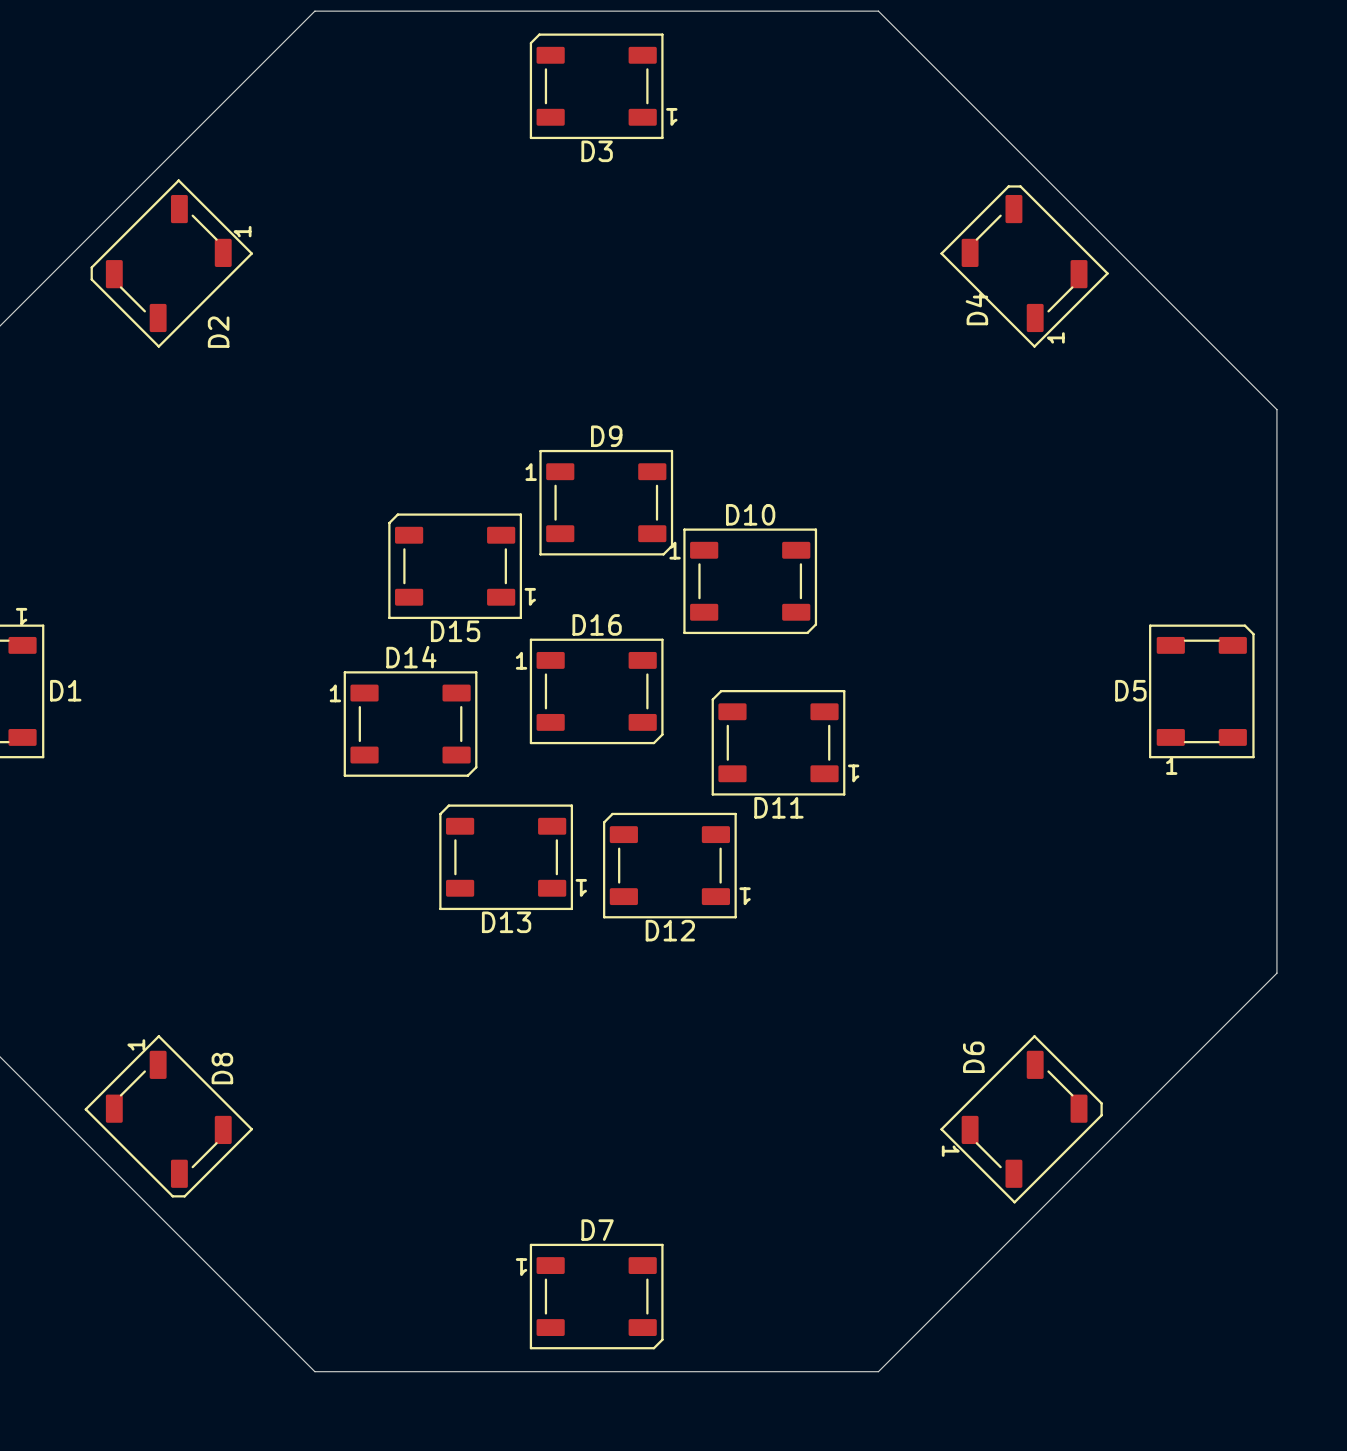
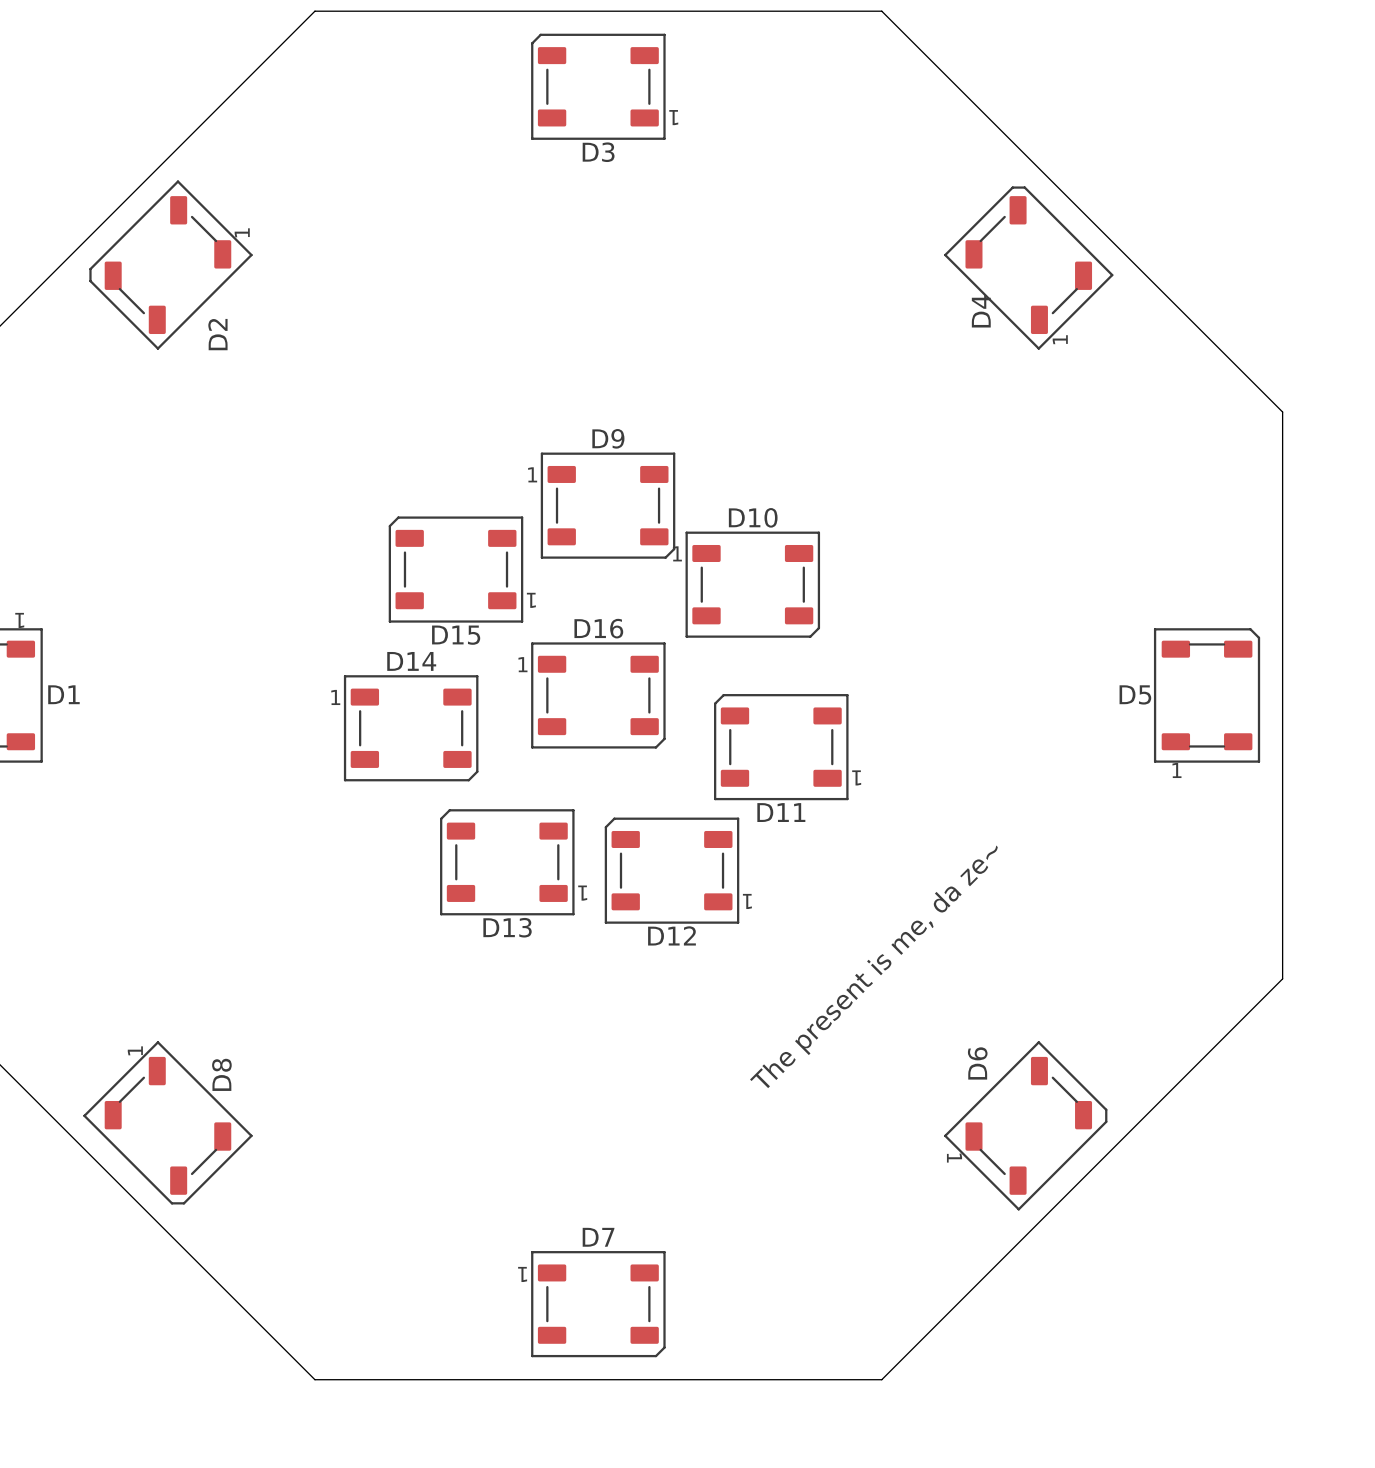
text: none -> The present is me, da ze~ (873, 966)

